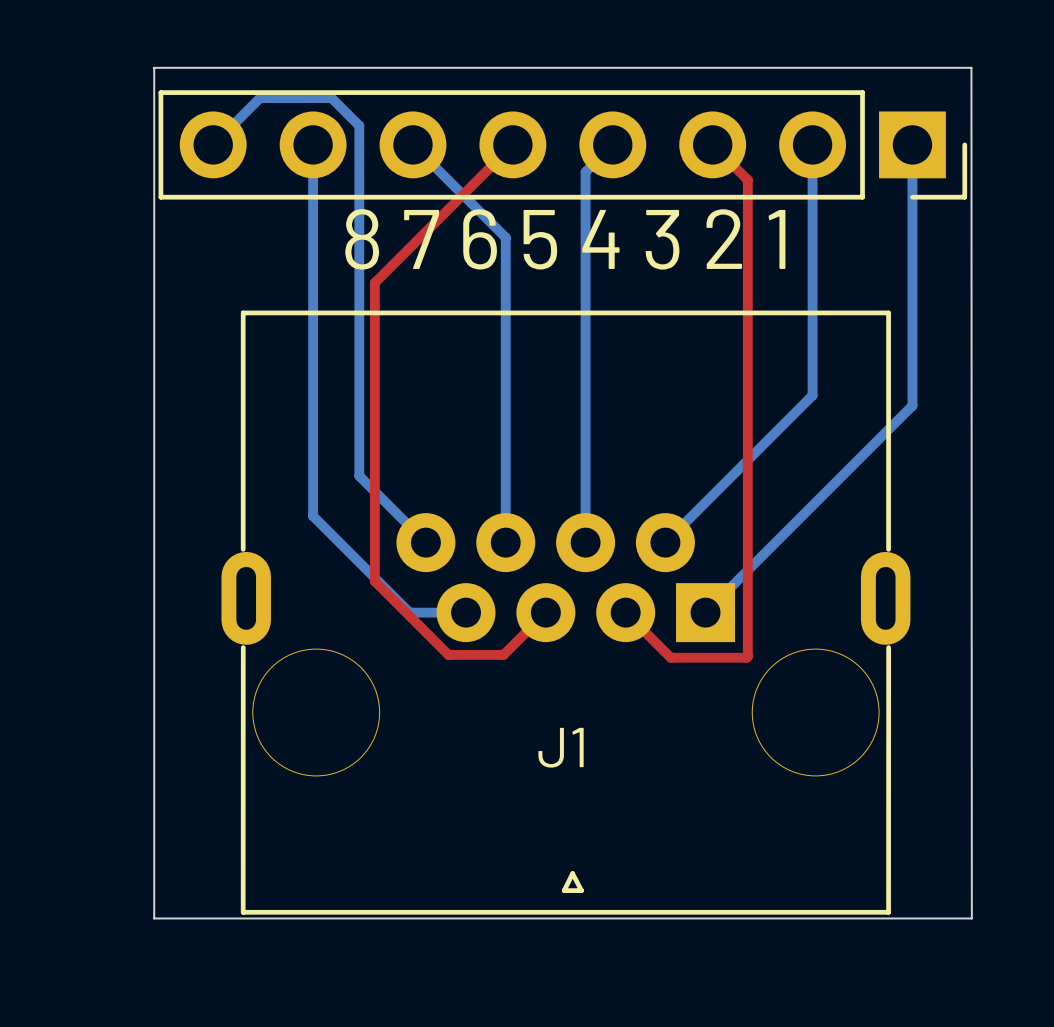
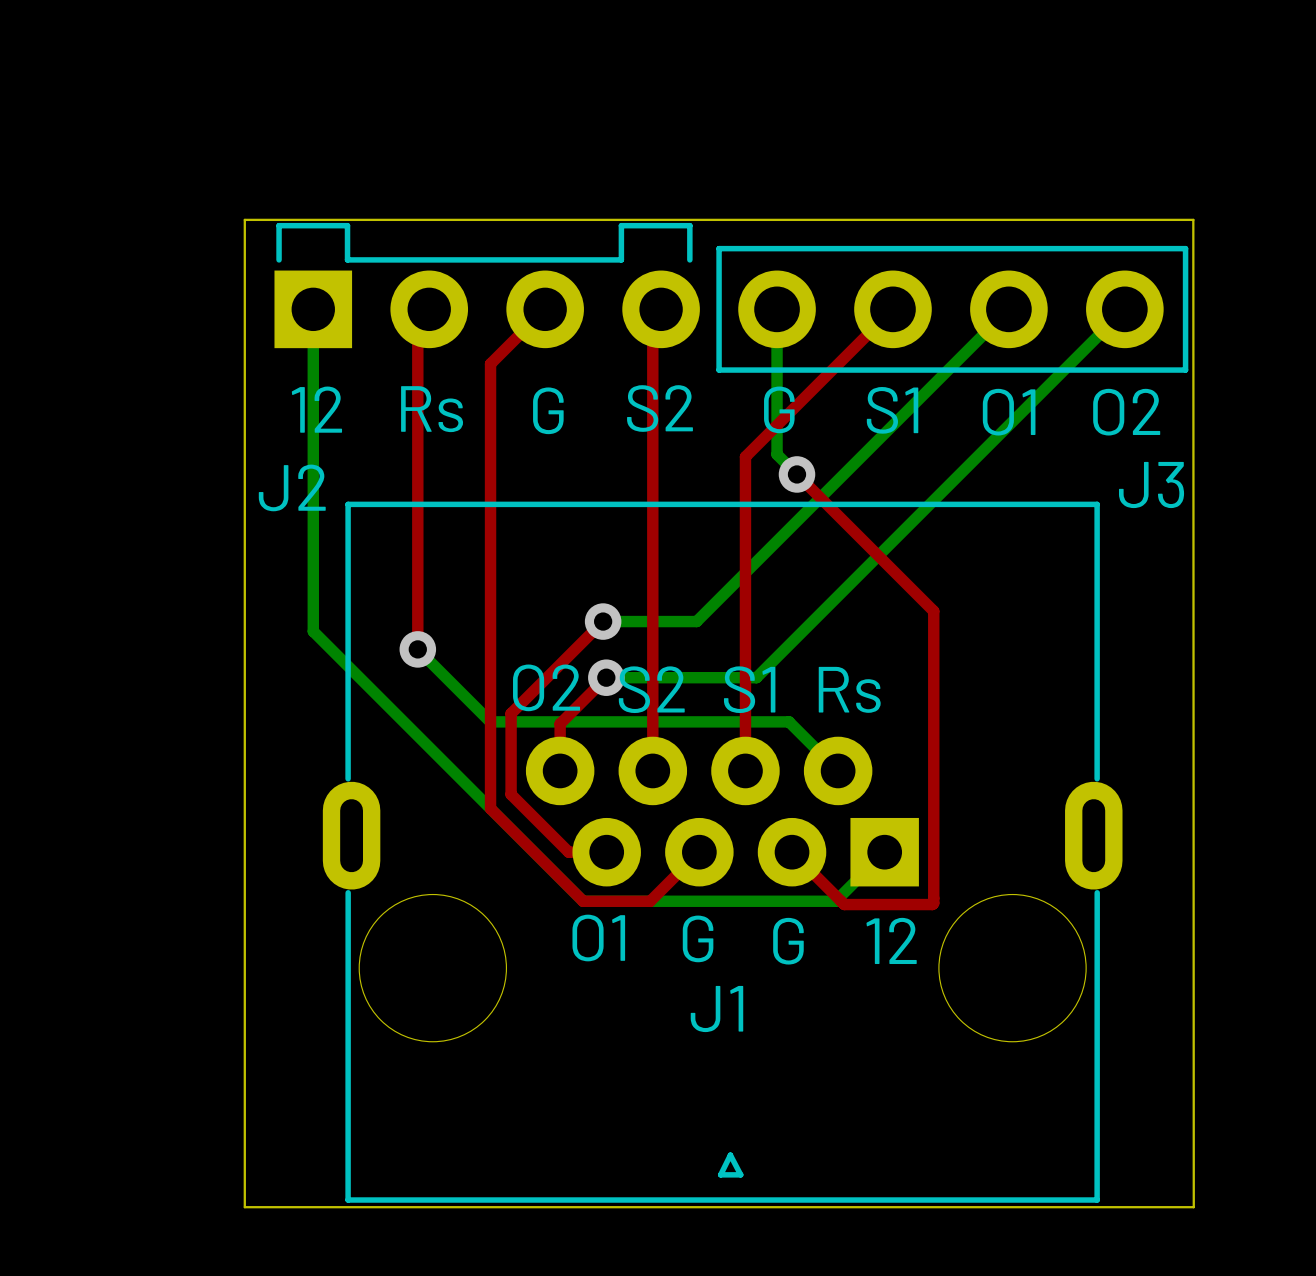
J2: none -> (487, 285)
bottom track: (213, 144) (260, 98) (331, 98) (359, 125) (359, 476) (425, 542) -> (313, 309) (313, 631) (583, 901) (835, 901) (884, 852)
bottom track: (313, 144) (313, 516) (409, 612) (466, 612) -> none
top track: none -> (429, 309) (417, 320) (417, 649)
bottom track: (413, 144) (505, 237) (505, 542) -> none
part: (562, 144) -> none
bottom track: (612, 144) (585, 172) (585, 542) -> (777, 309) (777, 454) (797, 474)
top track: (712, 144) (747, 180) (747, 404) -> (797, 474) (933, 611)
top track: none -> (892, 309) (745, 456) (745, 770)
J3: none -> (952, 309)
bottom track: (812, 144) (812, 395) (665, 542) -> (1008, 309) (696, 621) (603, 621)
bottom track: (912, 144) (912, 405) (705, 612) -> (1124, 309) (756, 677) (606, 677)
top track: (505, 152) (374, 282) (374, 581) (448, 654) -> (545, 309) (490, 363) (490, 808) (583, 901) (586, 901)
top track: none -> (652, 317) (652, 770)
text: none -> Rs (432, 409)
text: none -> S2 (659, 408)
text: none -> 12 (316, 409)
text: none -> G (779, 409)
text: none -> S1 (892, 410)
text: none -> G (548, 410)
text: none -> O1 (1009, 412)
text: none -> O2 (1126, 412)
text: 8 7 6 5 4 3 2 1 (565, 239) -> none
via: none -> (797, 474)
top track: none -> (603, 621) (511, 713) (511, 794) (568, 852) (606, 852)
via: none -> (603, 621)
bottom track: none -> (417, 649) (490, 721) (789, 721) (838, 770)
via: none -> (417, 649)
top track: none -> (606, 677) (560, 723) (560, 770)
via: none -> (606, 677)
text: none -> O2 (546, 687)
text: none -> S2 (651, 689)
text: none -> S1 (749, 689)
text: none -> Rs (849, 689)
text: none -> O1 (598, 938)
text: none -> G (698, 938)
text: none -> G (788, 941)
text: none -> 12 (891, 940)

